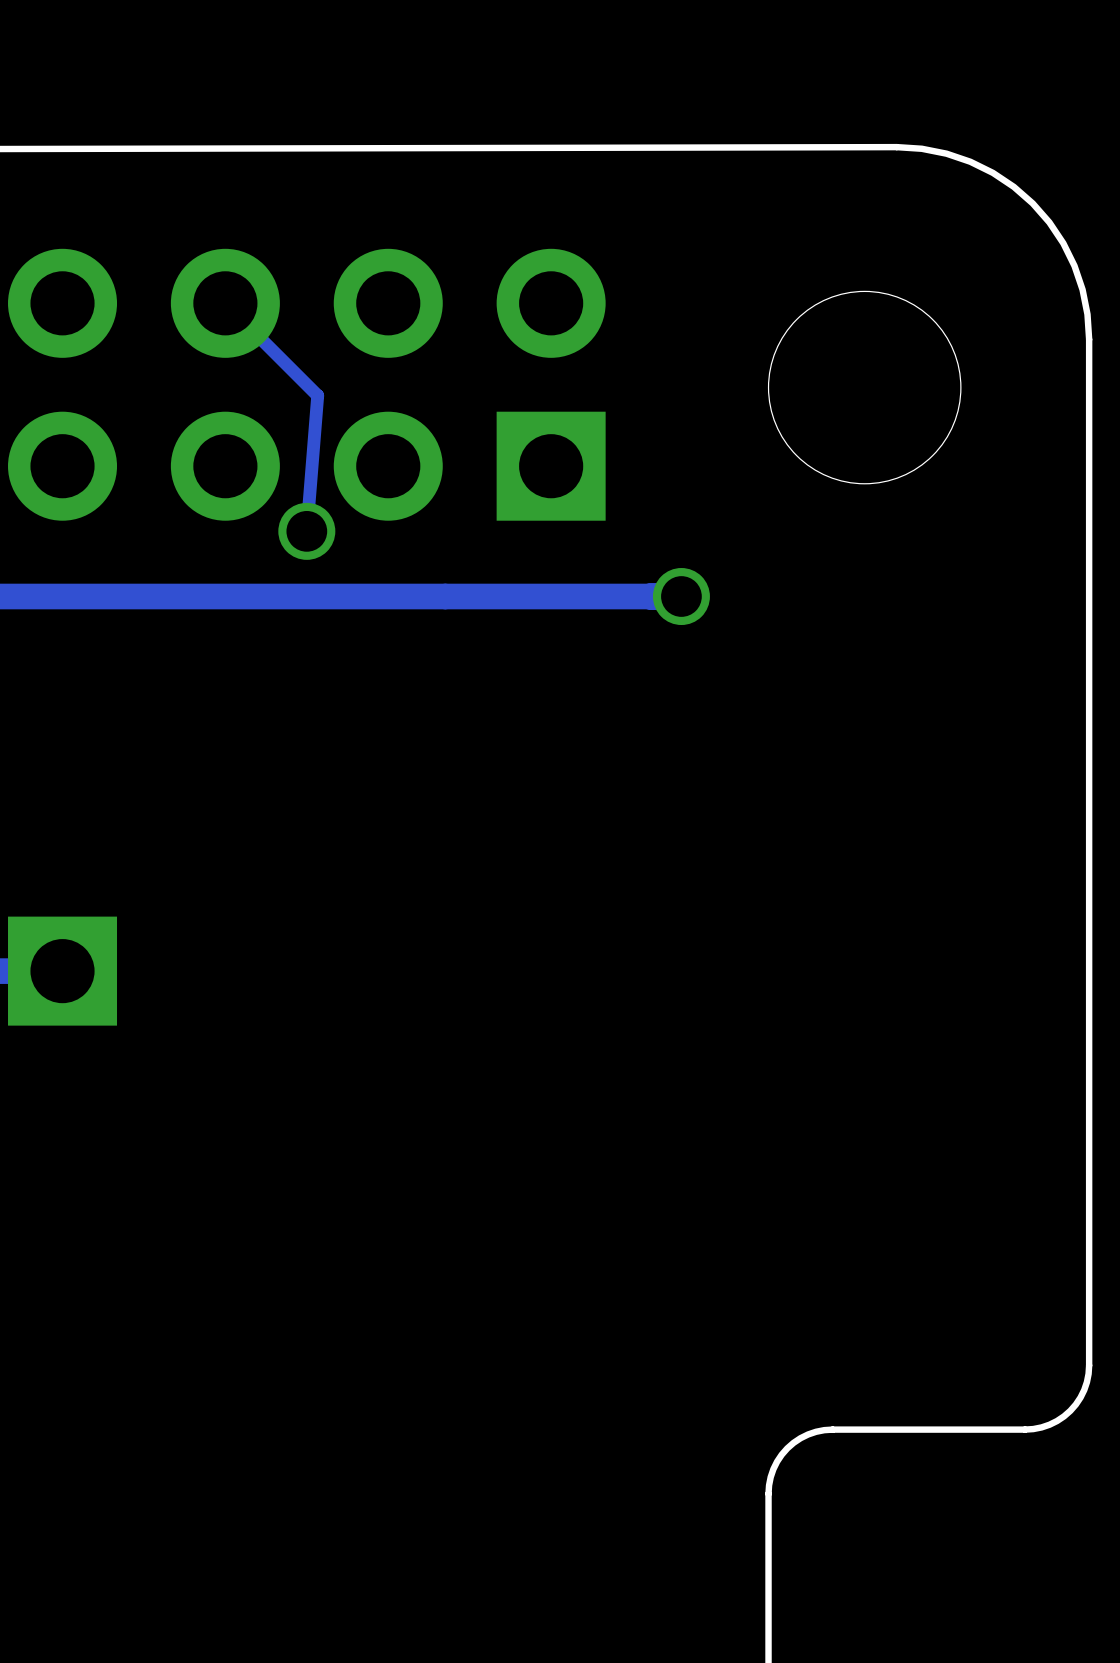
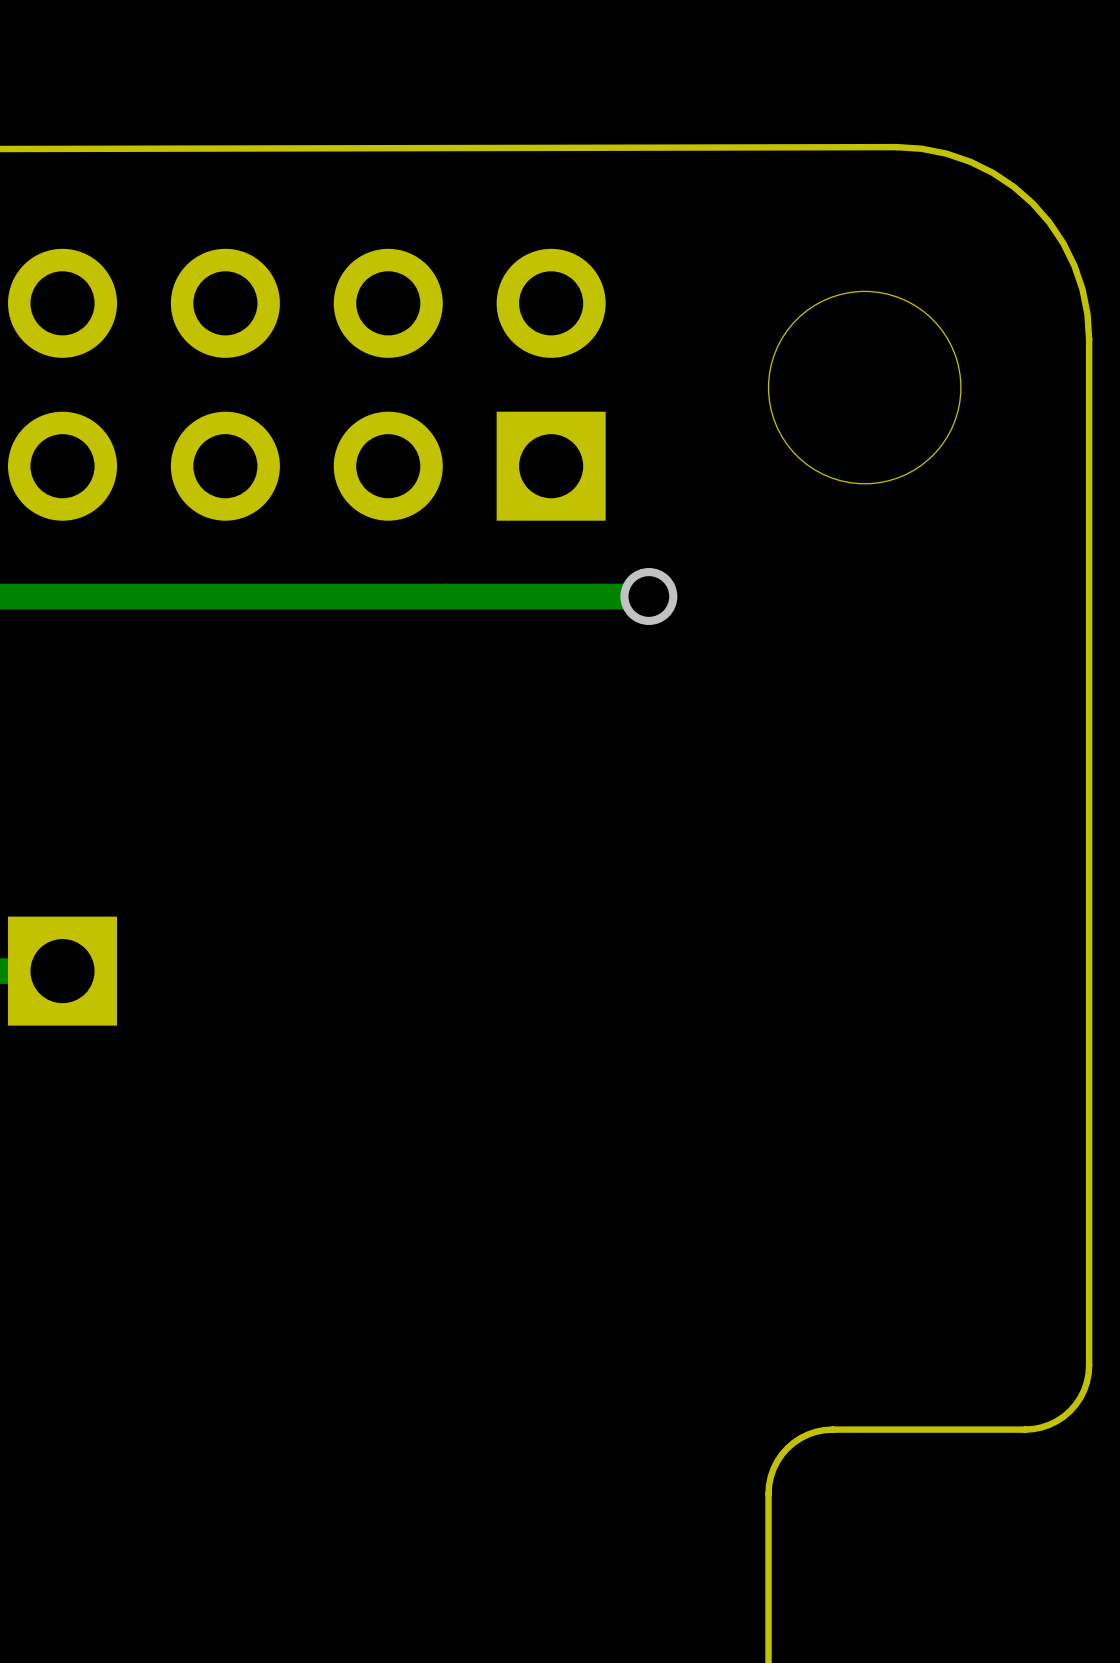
track: (225, 303) (317, 395) (306, 531) (317, 520) -> none
via: (306, 531) -> none
via position: (681, 596) -> (648, 596)

